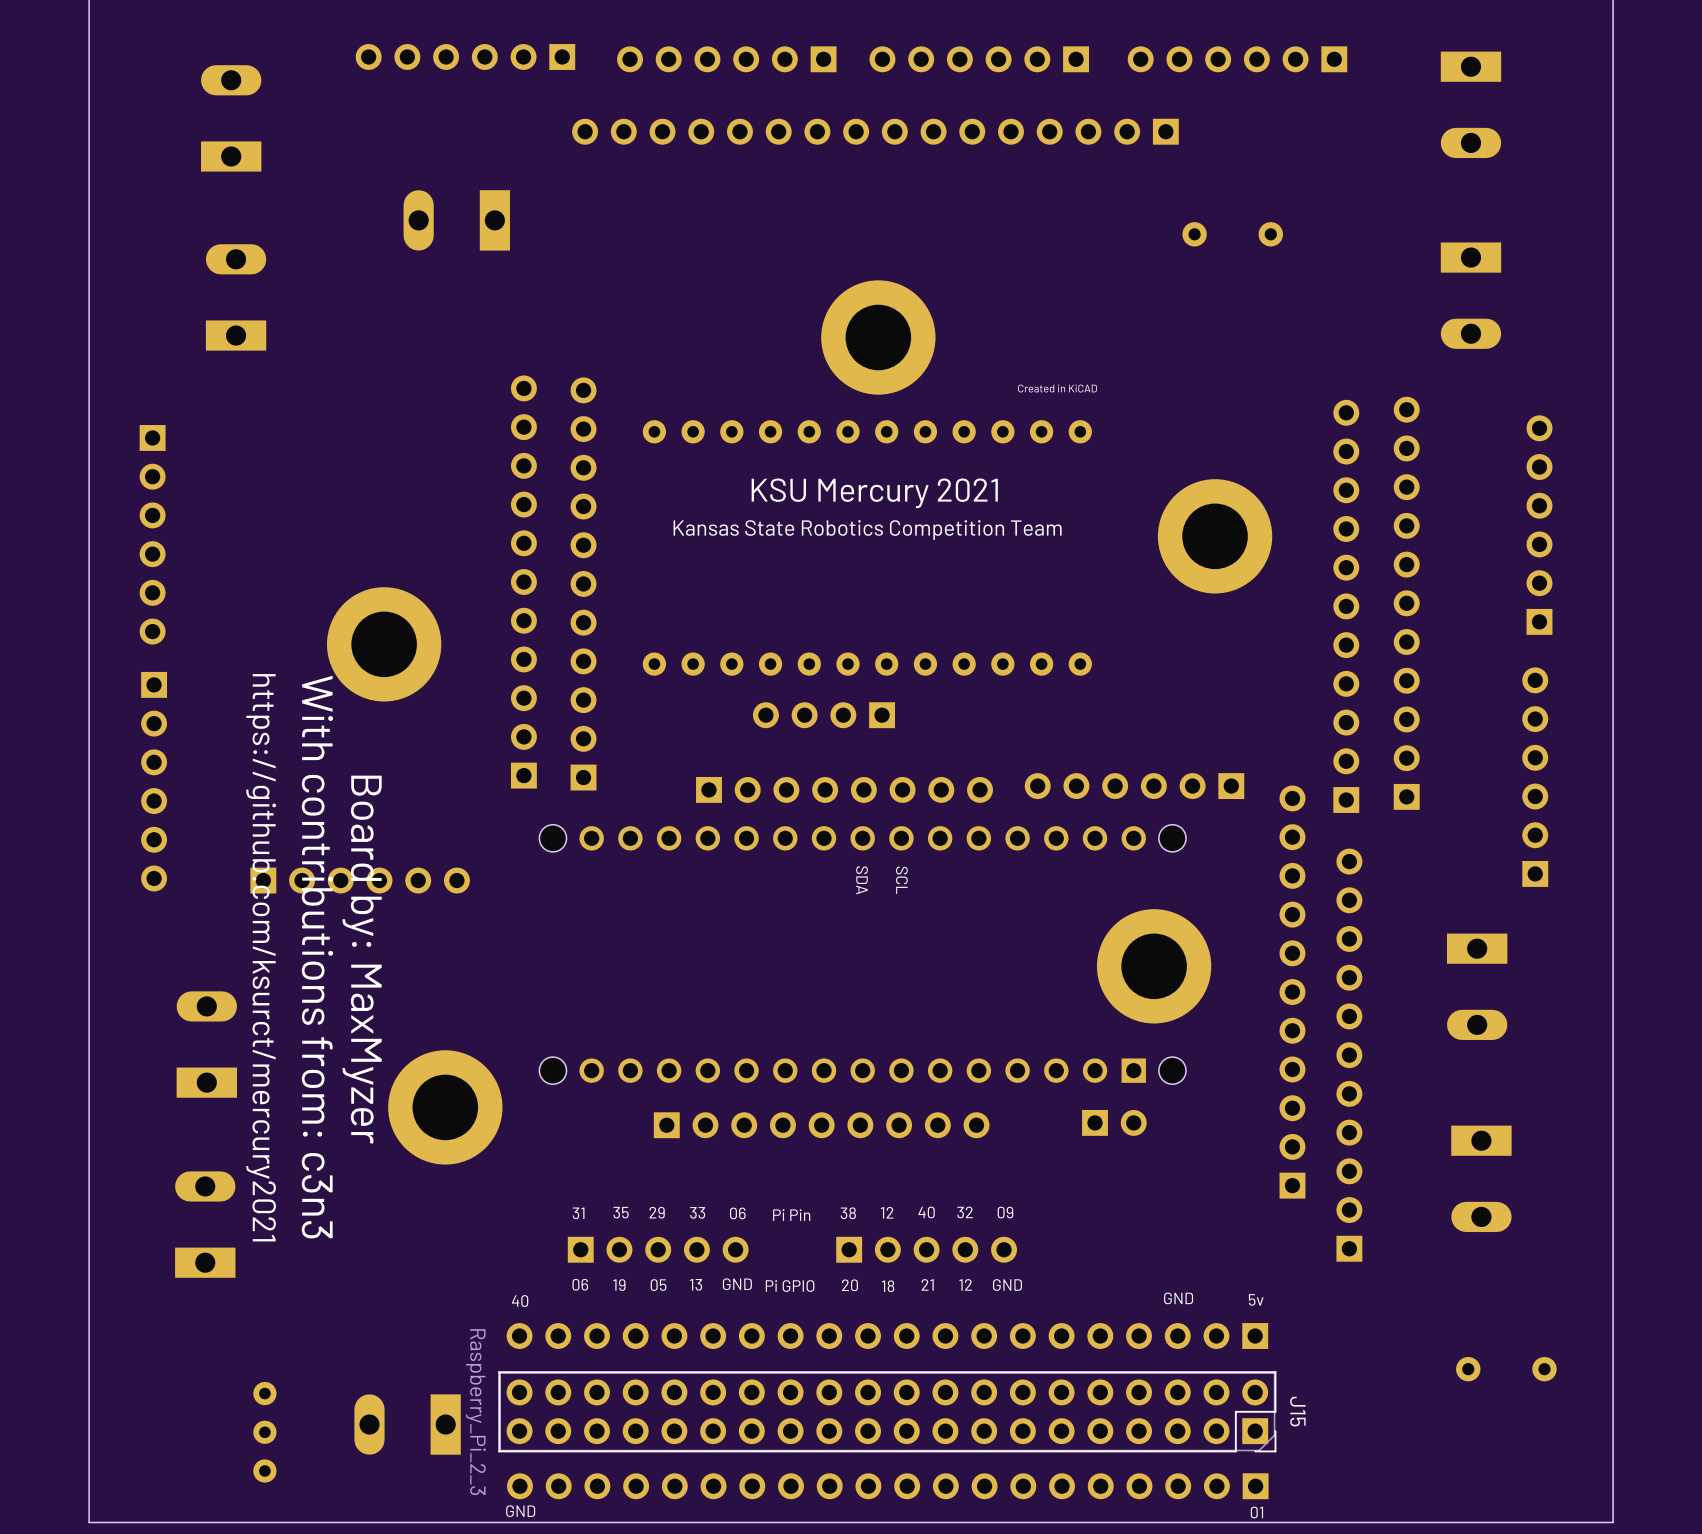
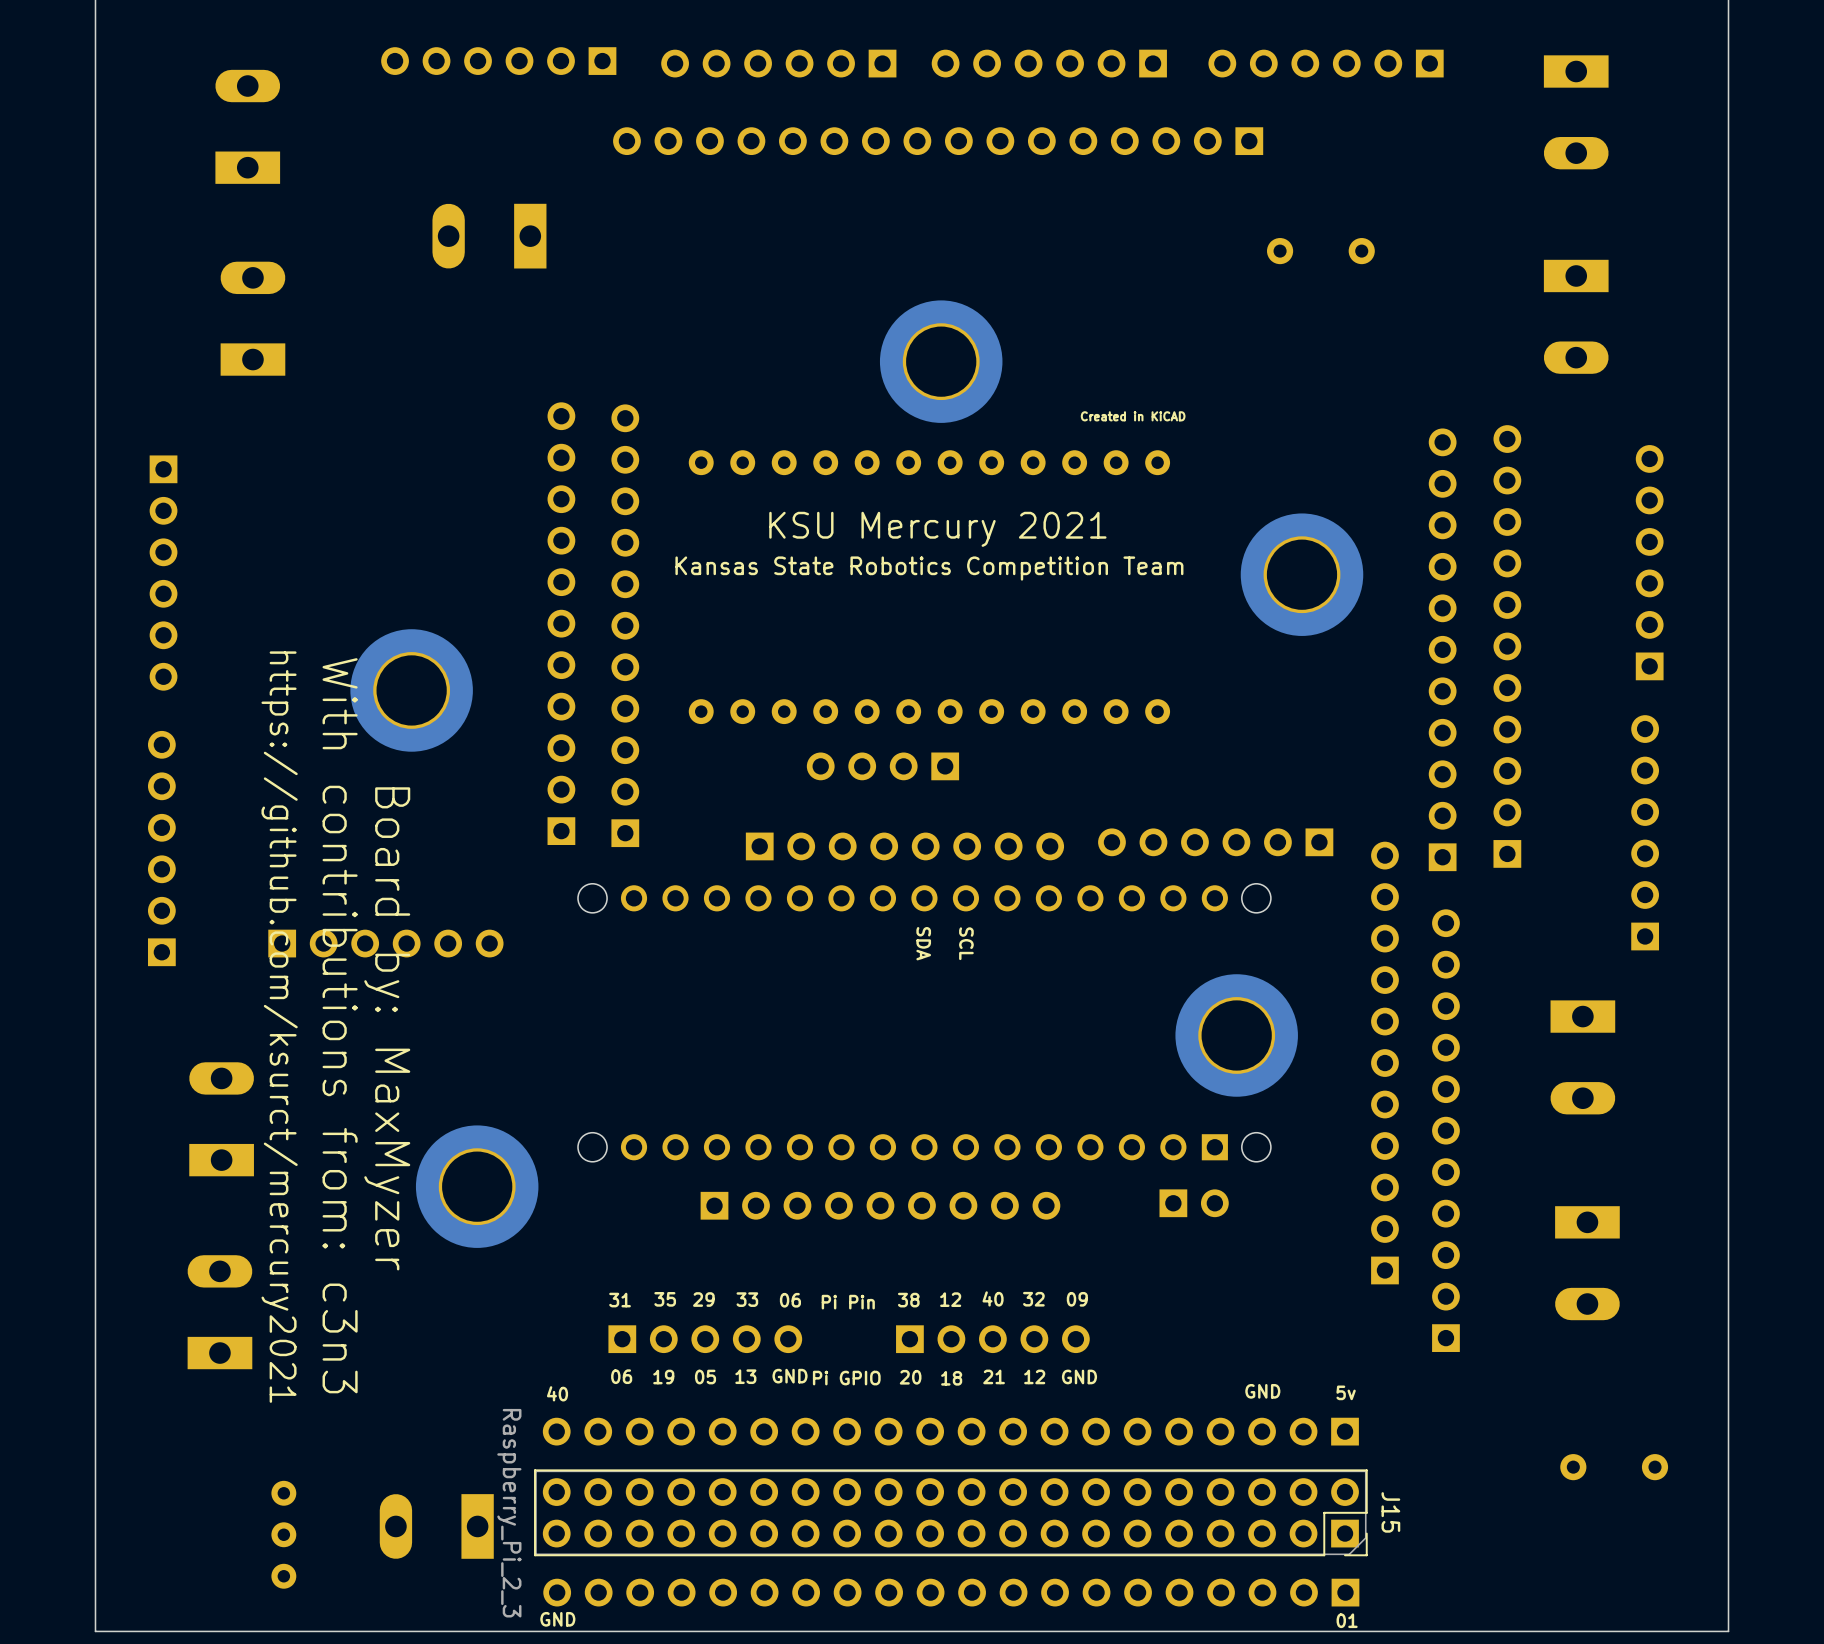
part rotation: 0° (154, 781) -> 180° (161, 848)

